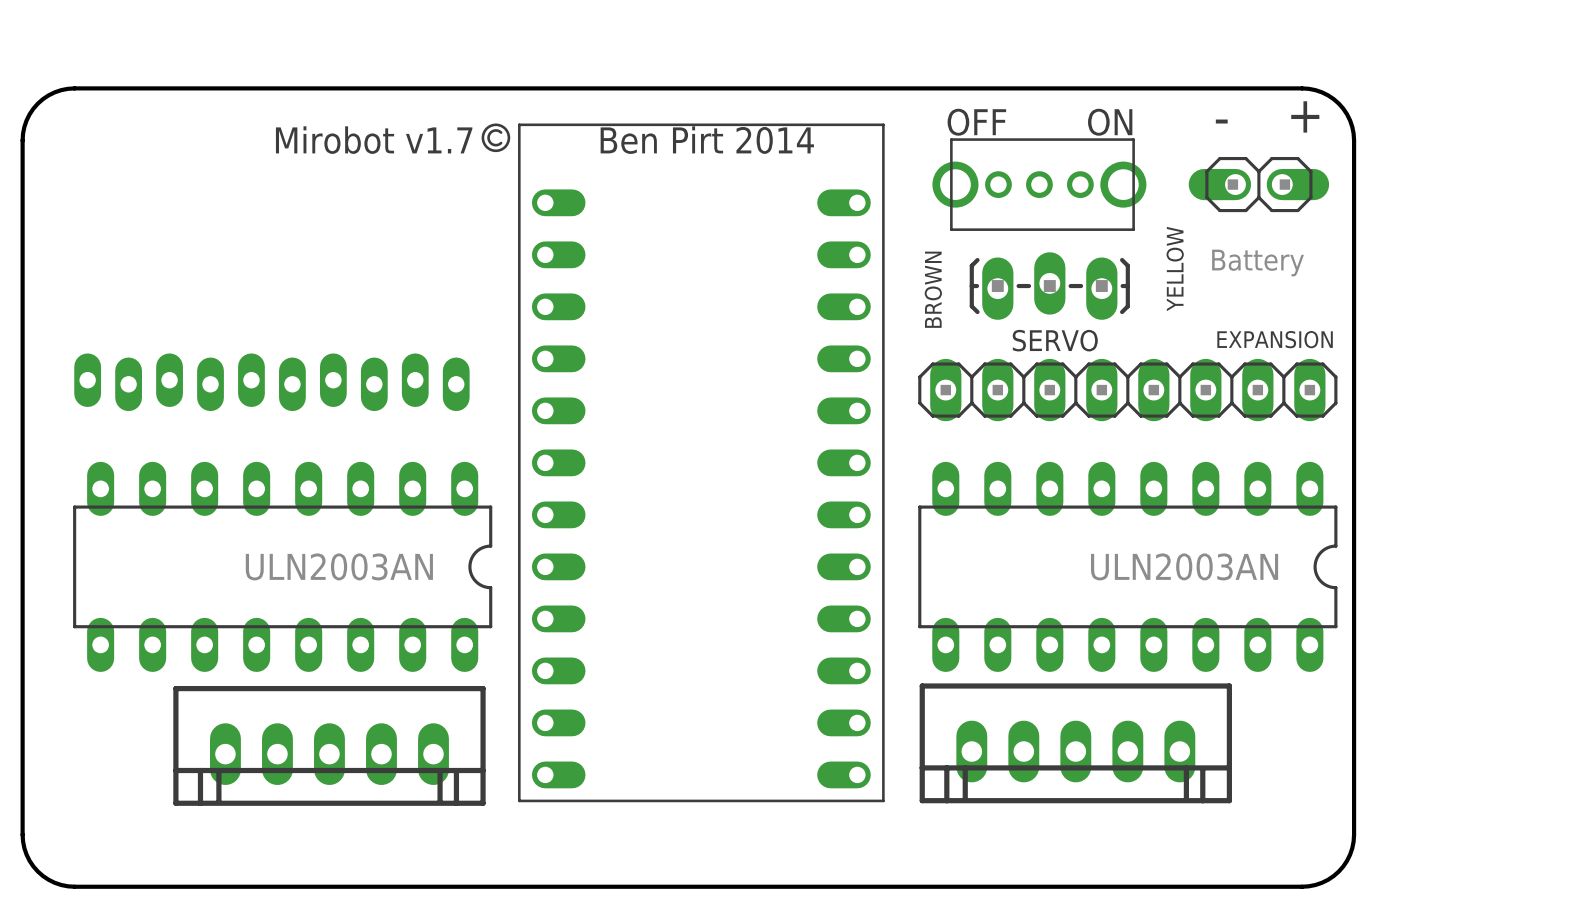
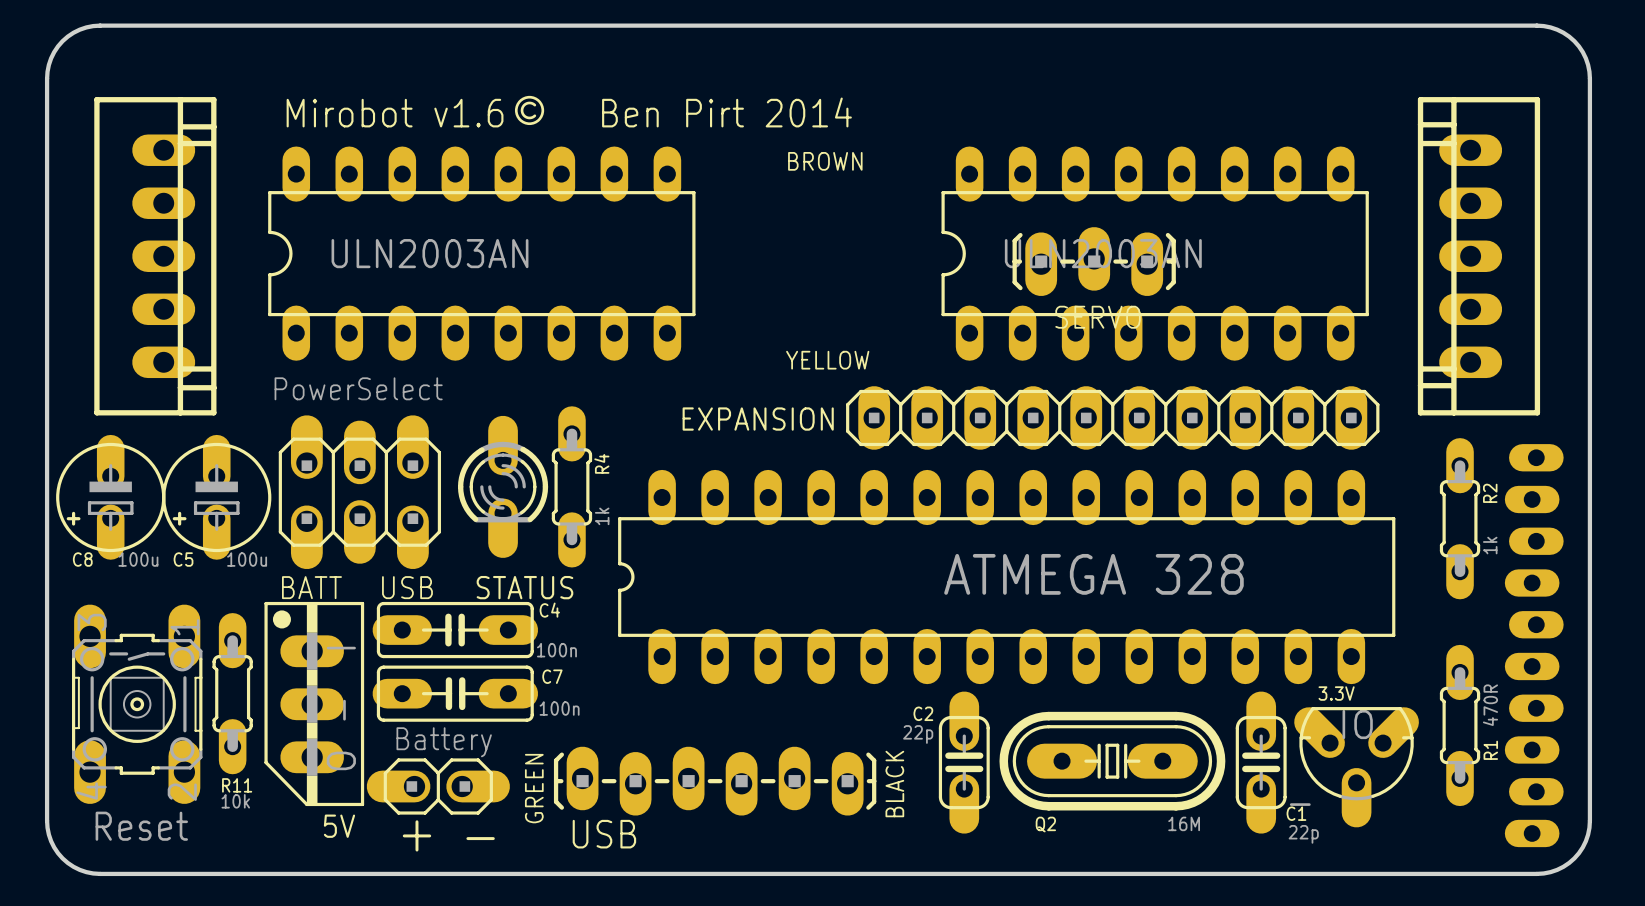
text: + (1305, 116) -> none
text: - (1221, 121) -> none
text: OFF (976, 122) -> none
text: ON (1110, 122) -> none
board edge: (22, 140) (26, 120) (37, 103) (54, 92) (74, 88) (1302, 88) (1315, 90) (1328, 95) (1338, 103) (1347, 114) (1352, 126) (1354, 140) (1354, 834) (1350, 854) (1338, 871) (1321, 882) (1302, 886) -> (47, 113) (47, 71) (54, 52) (62, 41) (73, 32) (86, 27) (100, 25) (1536, 25) (1550, 27) (1563, 32) (1574, 41) (1582, 52) (1588, 64) (1589, 78) (1589, 820) (1588, 834) (1582, 847) (1574, 858) (1557, 869) (1543, 873) (1351, 873)
text: Mirobot v1.7 (374, 140) -> Mirobot v1.6 (395, 113)
part: (1039, 184) -> none
part: Battery (1258, 184) -> none
text rotation: 0° (1175, 269) -> 90° clockwise (827, 360)
text position: YELLOW (1175, 269) -> YELLOW (827, 360)
part: none -> (1478, 256)
text rotation: 0° (933, 289) -> 90° clockwise (825, 161)
text position: BROWN (933, 289) -> BROWN (825, 161)
part: (271, 382) -> none
EXPANSION: (1127, 390) -> none
EXPANSION: none -> (1112, 417)
part: (701, 462) -> none
STATUS: none -> (503, 486)
R4: none -> 1k (571, 486)
part: none -> PowerSelect (359, 492)
C8: none -> 100u (110, 497)
C5: none -> 100u (216, 497)
R2: none -> 1k (1460, 518)
part rotation: 0° (282, 566) -> 180° (481, 253)
part position: (282, 566) -> (481, 253)
part rotation: 0° (1127, 566) -> 180° (1155, 253)
part position: (1127, 566) -> (1155, 253)
part: none -> ATMEGA 328 (1006, 577)
text: none -> BATT (311, 587)
text: none -> USB (407, 587)
C7: none -> 100n (455, 630)
part: none -> (1534, 645)
R11: none -> 10k (232, 693)
C4: none -> 100n (455, 693)
part: none -> Reset (137, 704)
5V: none -> (314, 704)
R1: none -> 470R (1460, 725)
part: (1075, 743) -> none
part rotation: 0° (329, 745) -> 90° counterclockwise (155, 256)
part position: (329, 745) -> (155, 256)
Q2: none -> 16M (1112, 761)
C2: none -> 22p (964, 762)
C1: none -> 22p (1261, 762)
3.3V: none -> (1356, 767)
USB: none -> (715, 781)
text: none -> BLACK (894, 784)
part: none -> Battery (438, 786)
text: none -> GREEN (534, 788)
text: none -> + (416, 835)
text: none -> - (480, 838)

